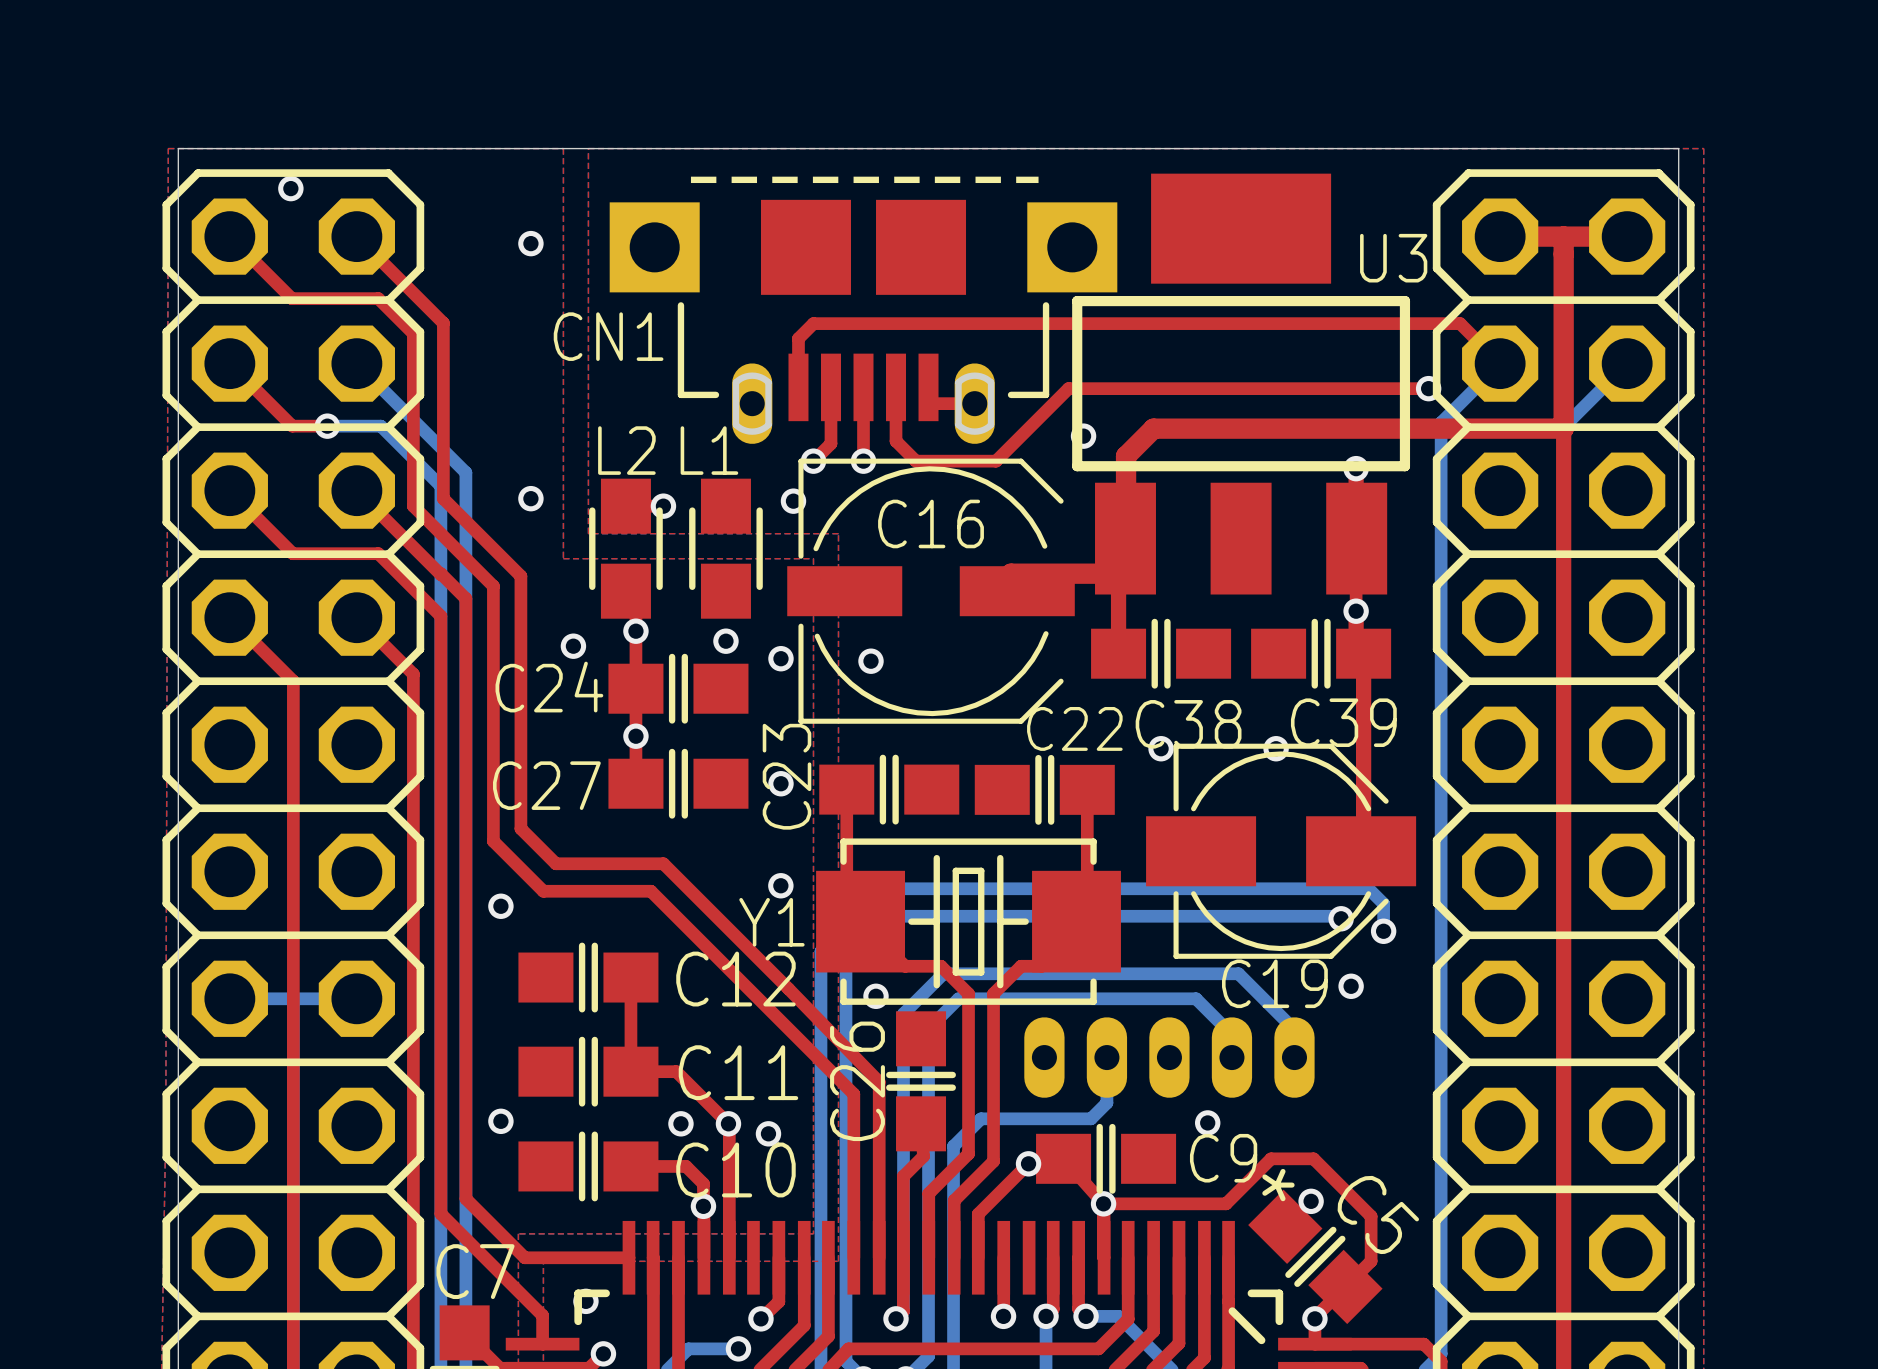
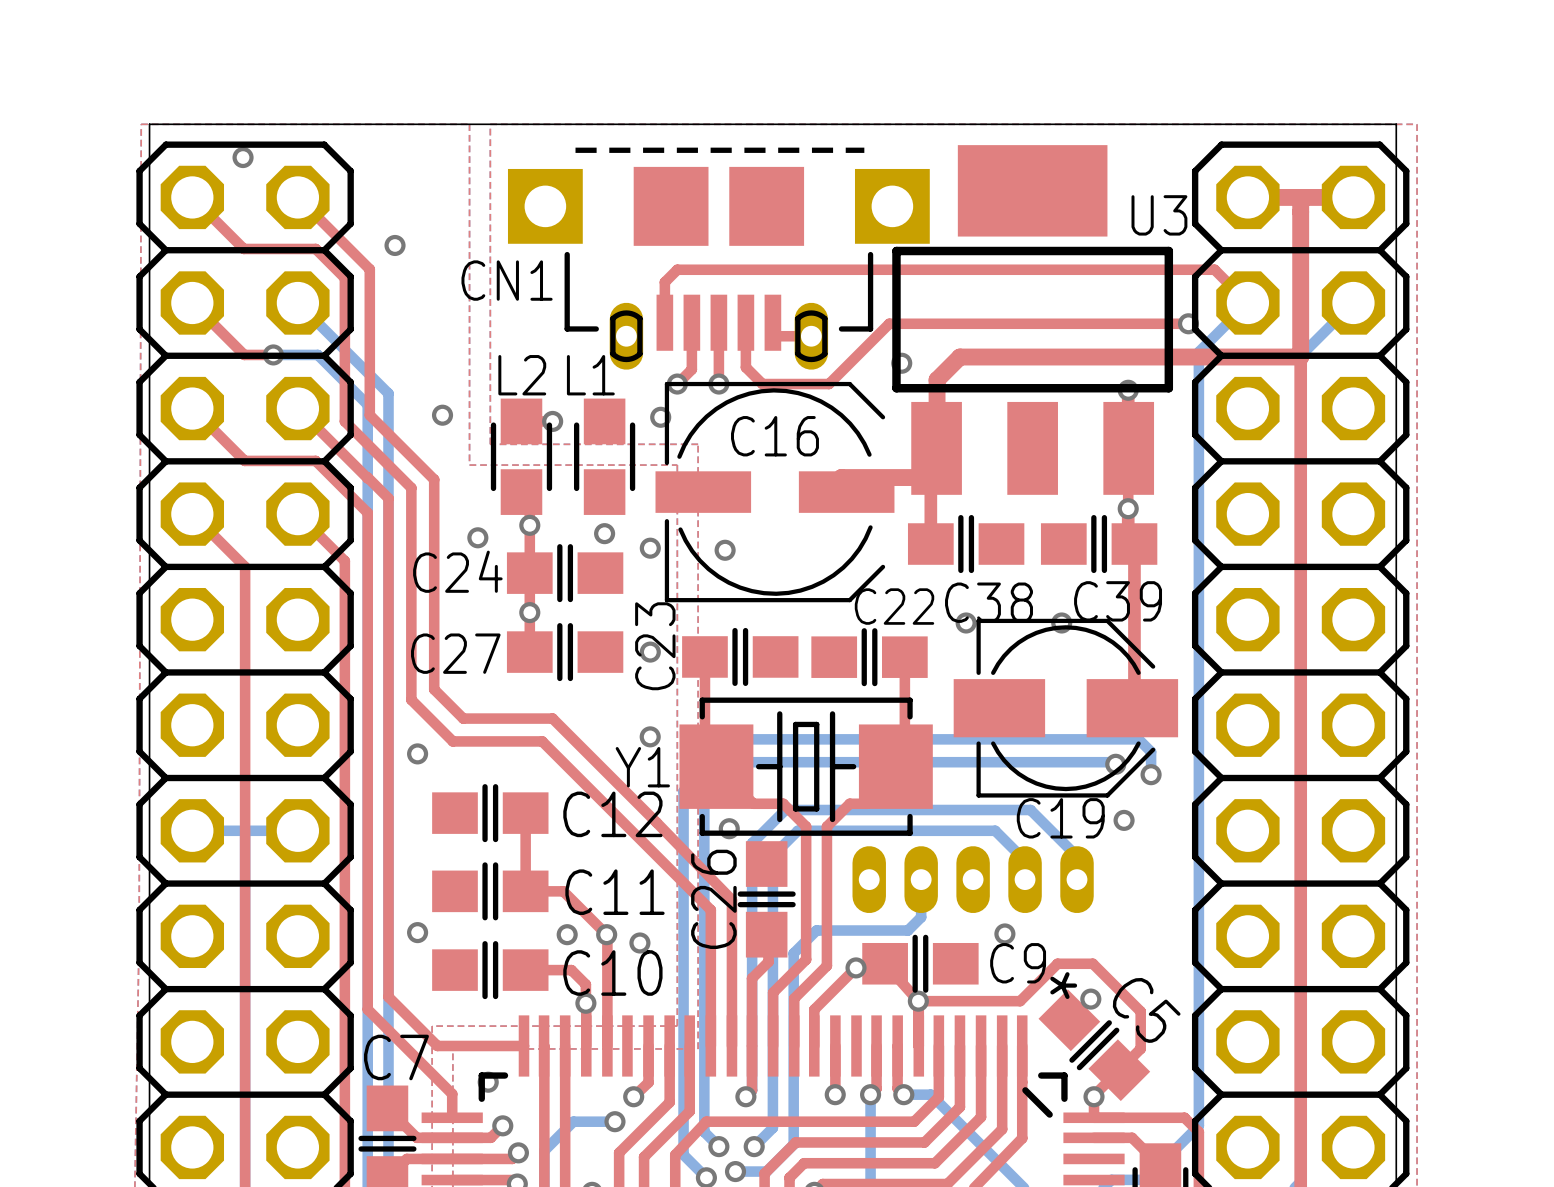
via position: (530, 243) -> (395, 245)

